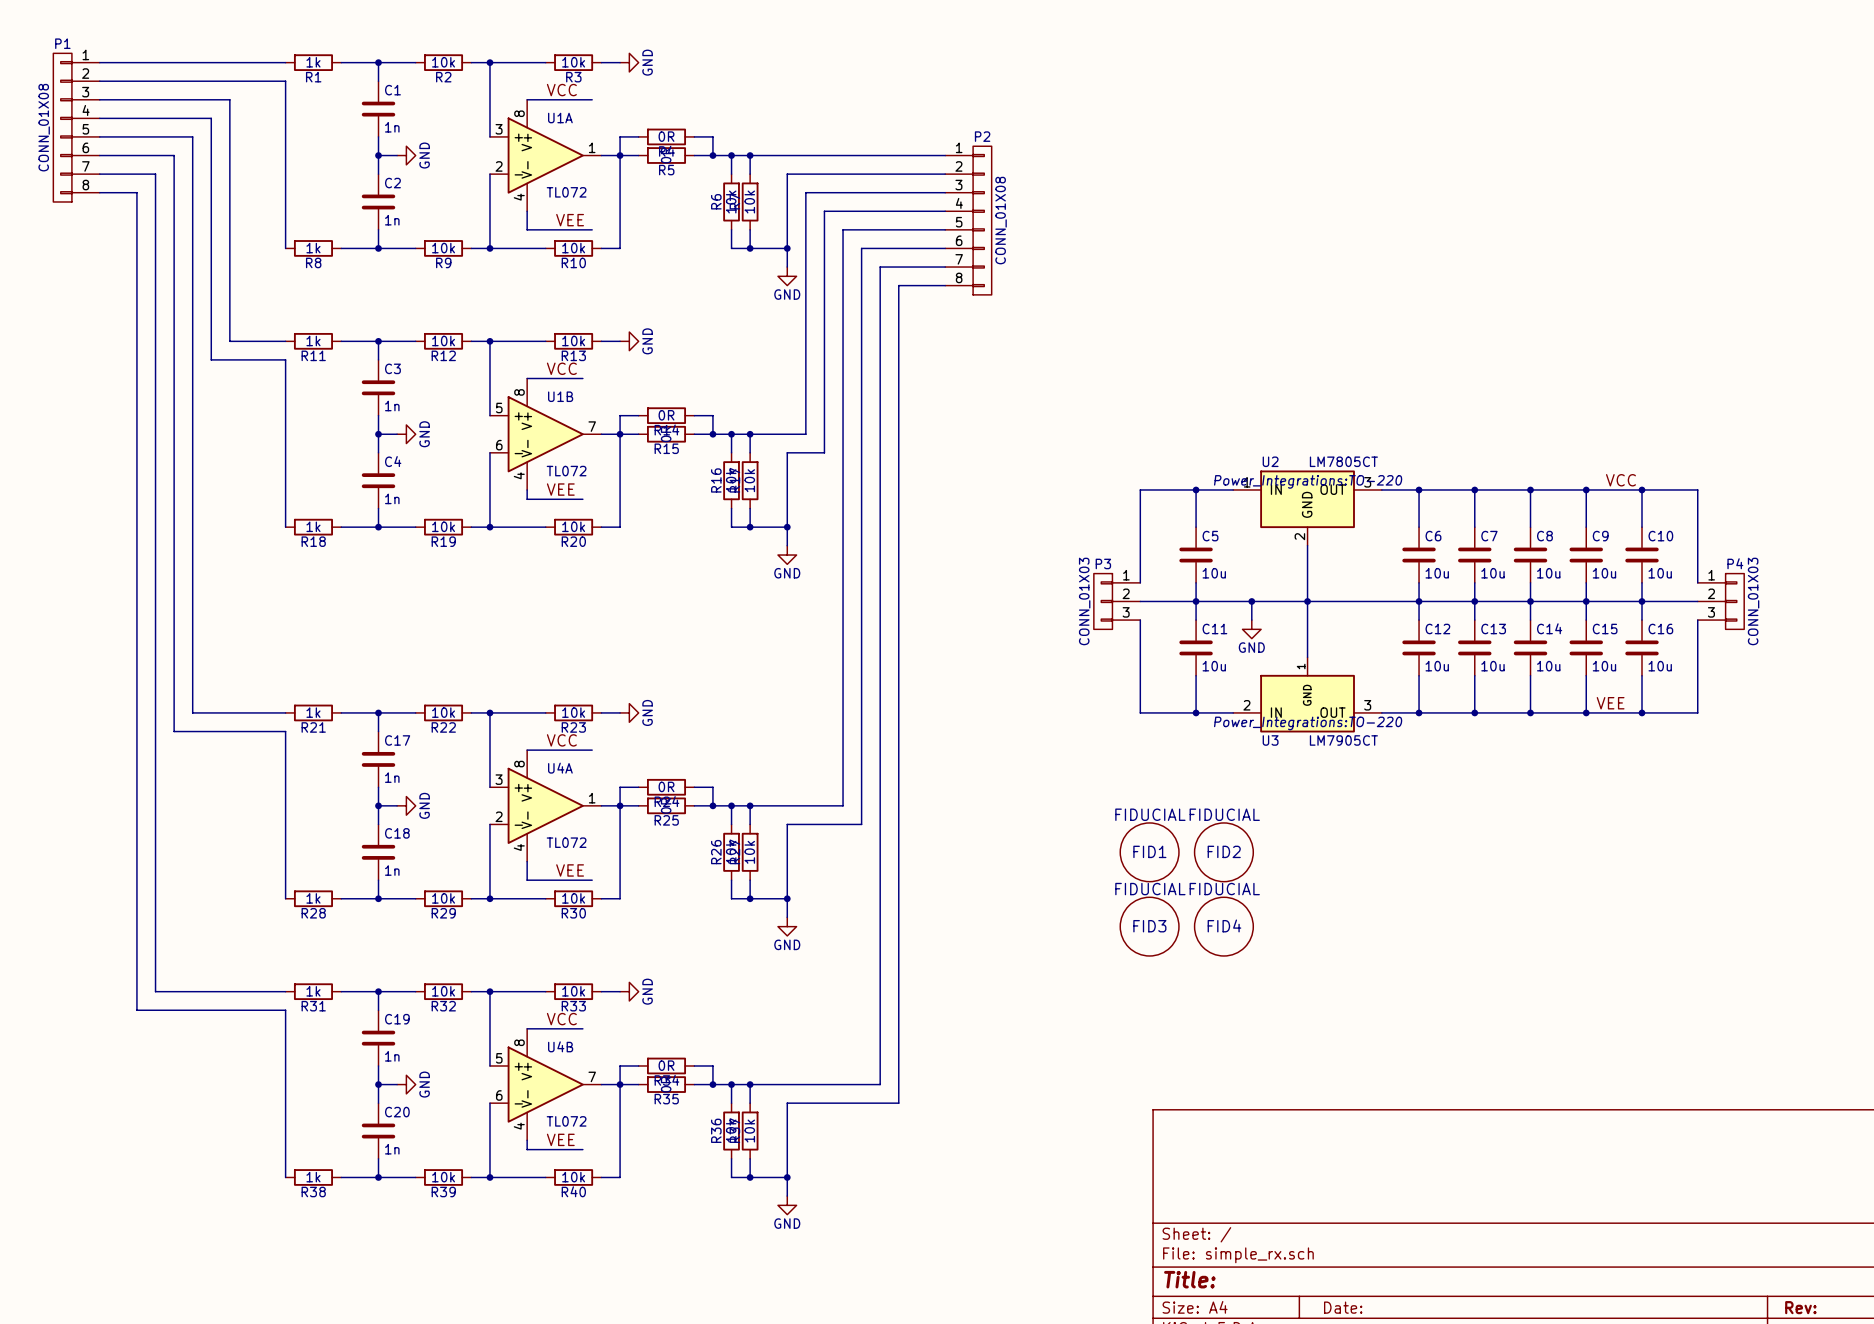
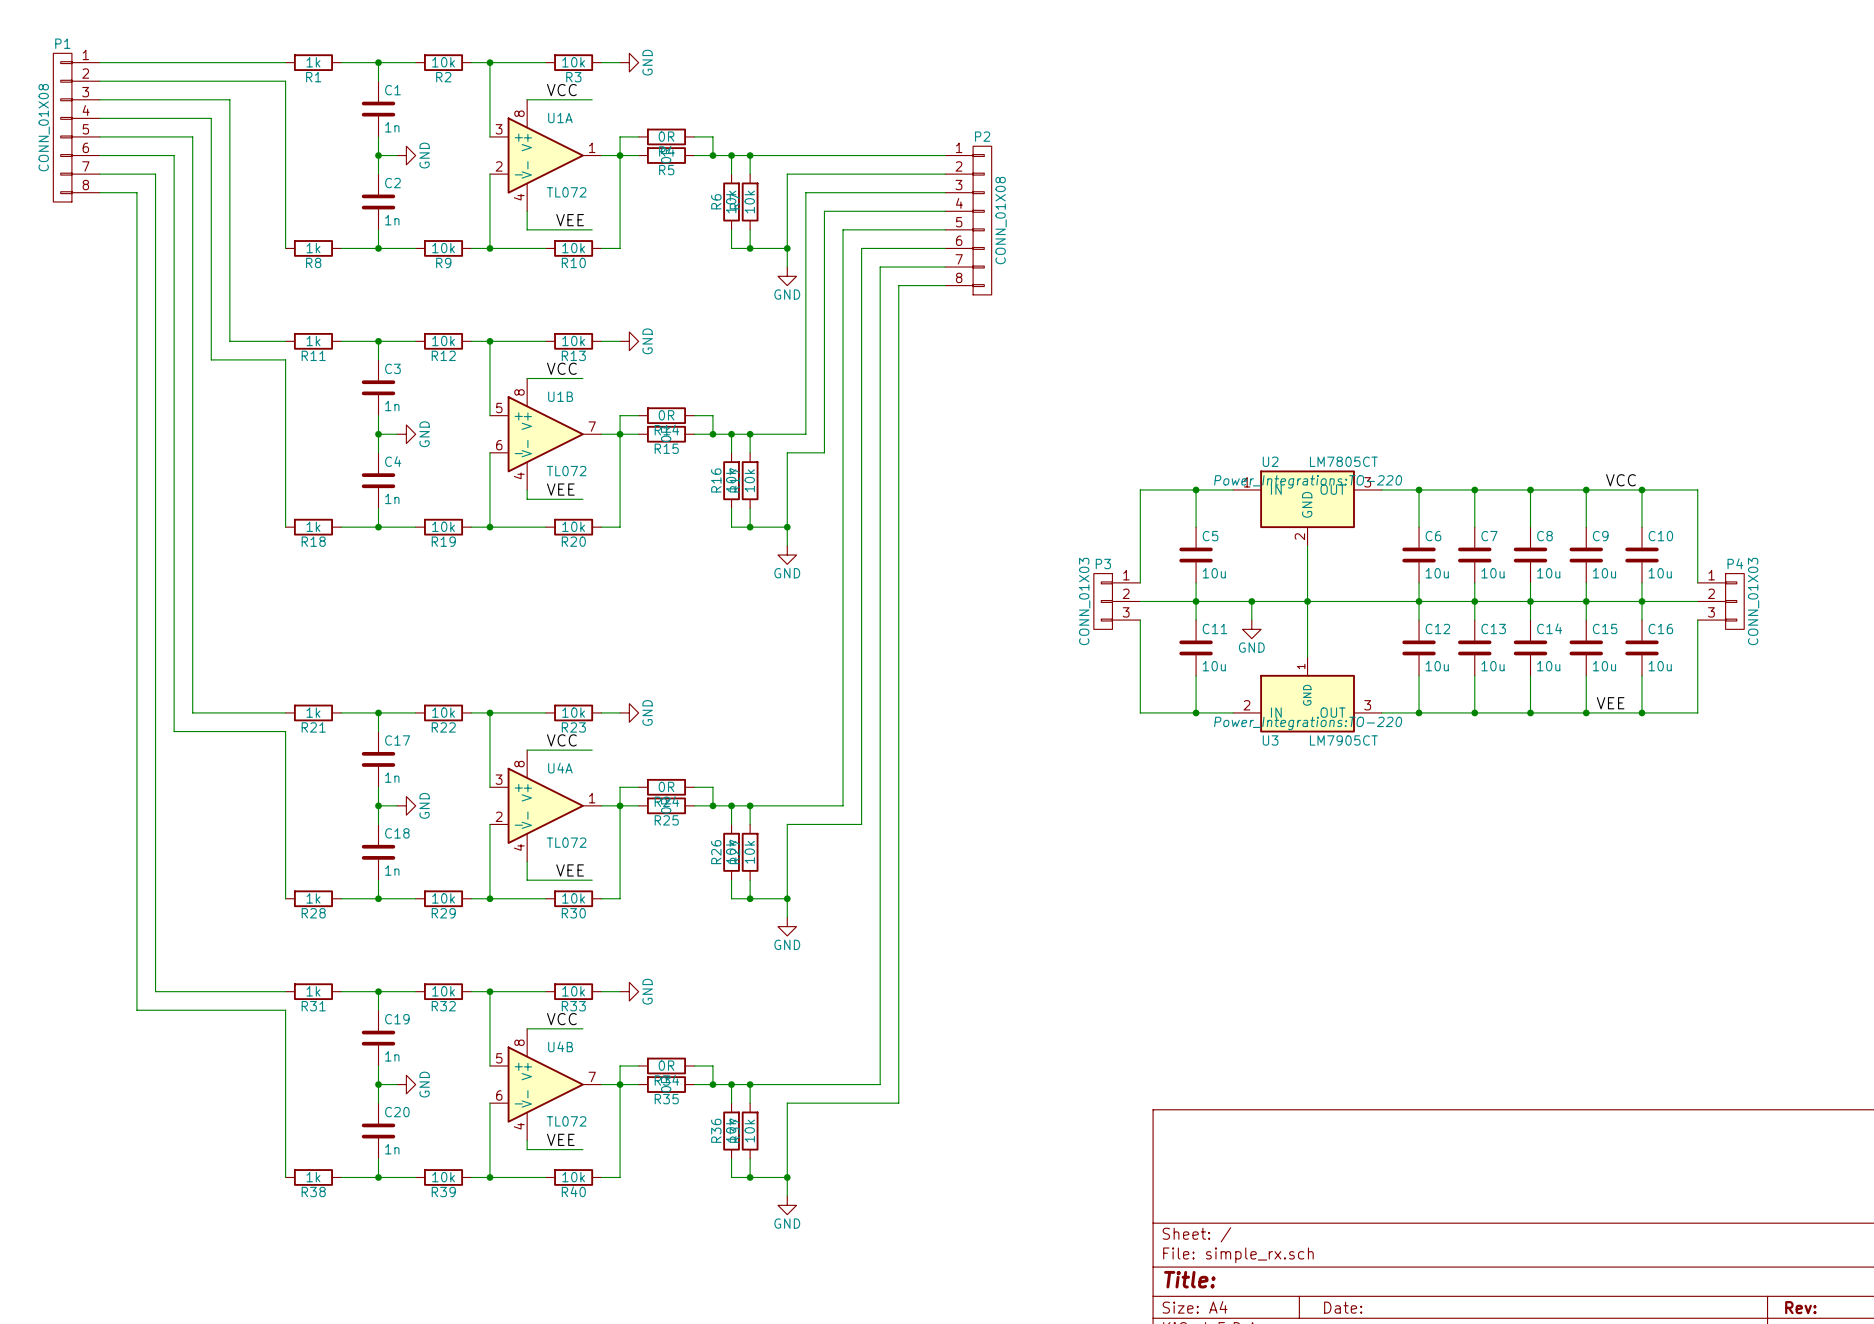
FID1: FIDUCIAL (1149, 852) -> none
FID2: FIDUCIAL (1223, 852) -> none
FID3: FIDUCIAL (1149, 926) -> none
FID4: FIDUCIAL (1223, 926) -> none

